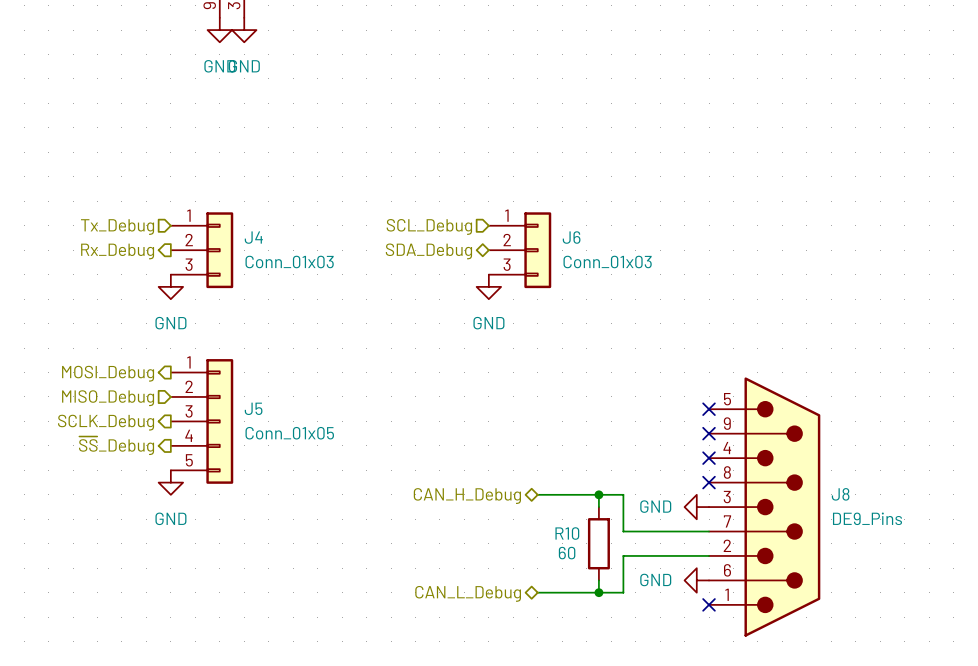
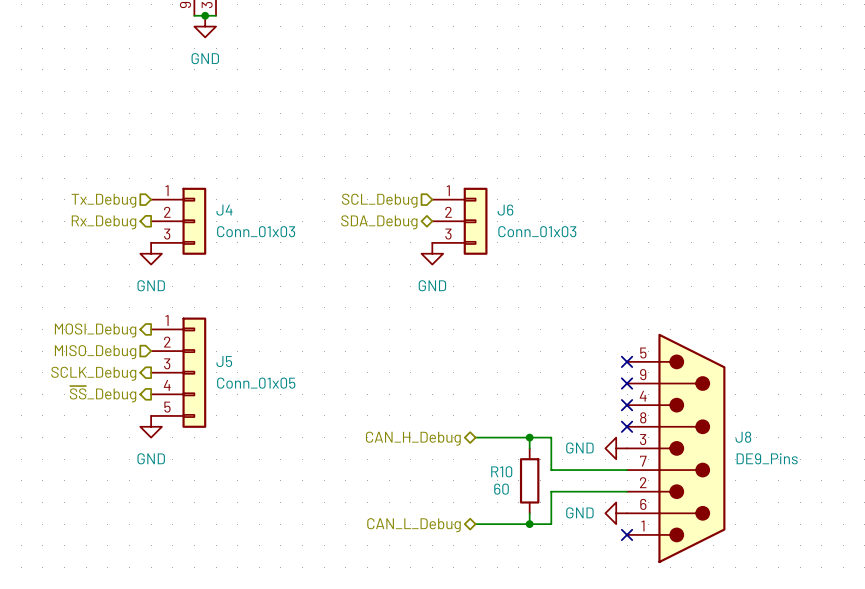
wire: none -> (194, 15) (216, 15)
junction: none -> (205, 15)
power symbol: GND (219, 30) -> none
power symbol: none -> GND (205, 26)
power symbol: GND (244, 30) -> none

